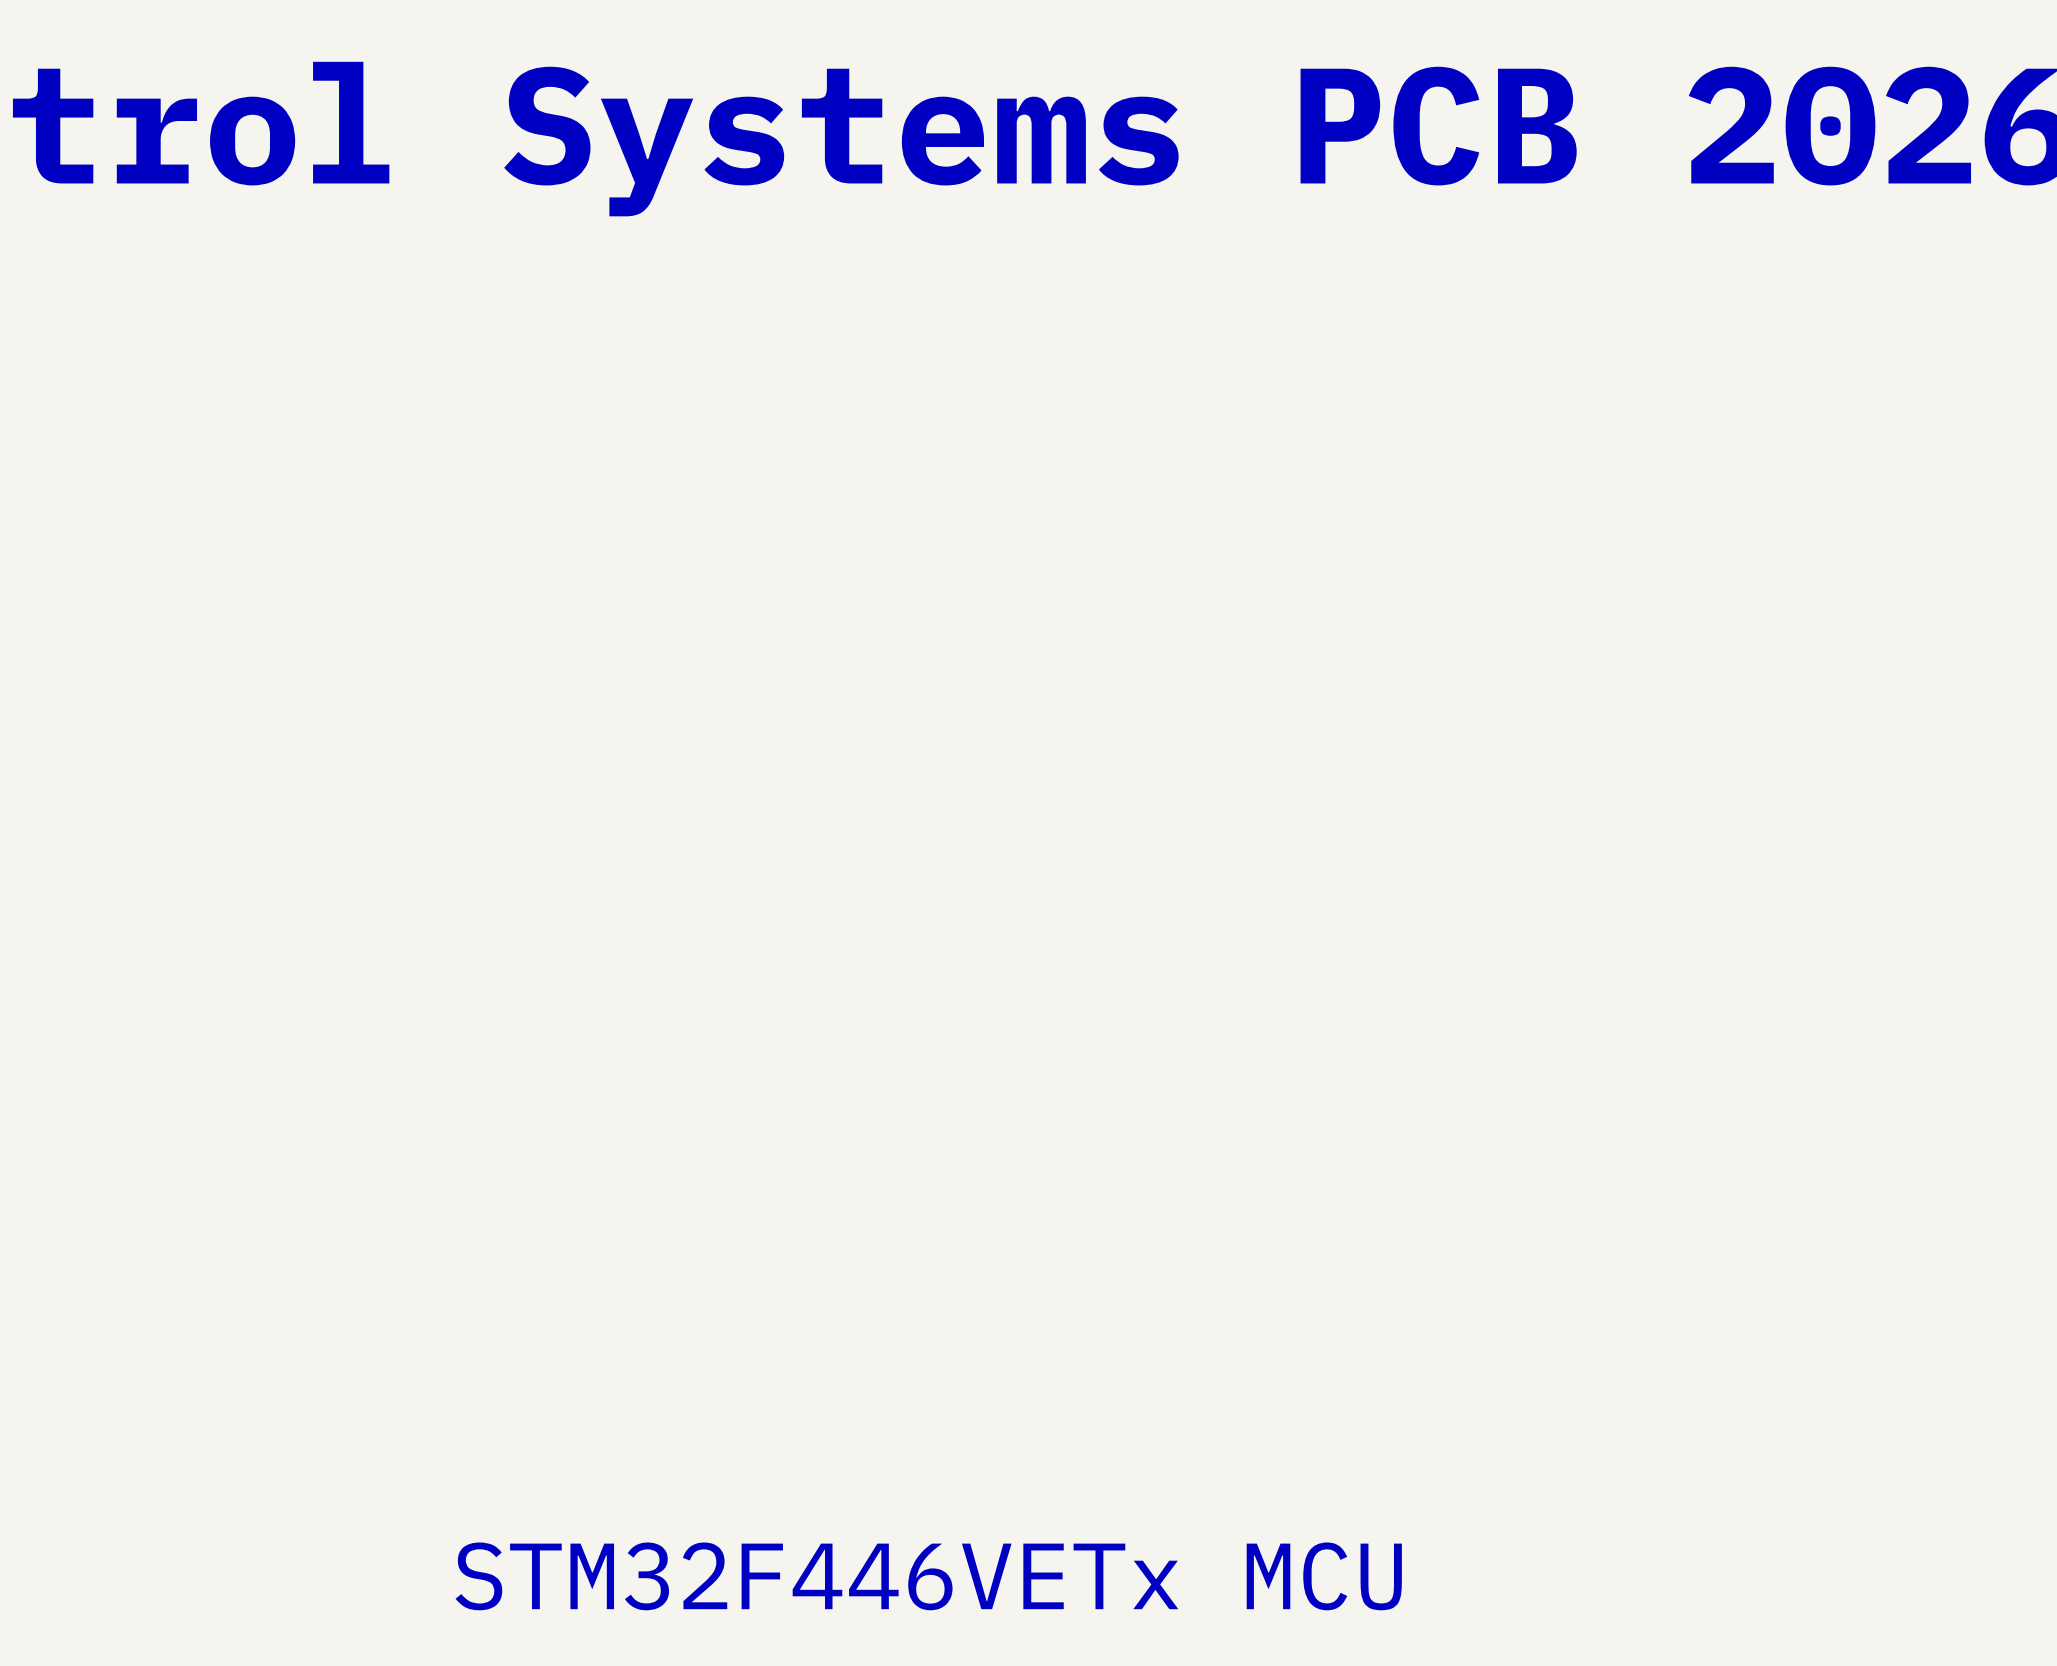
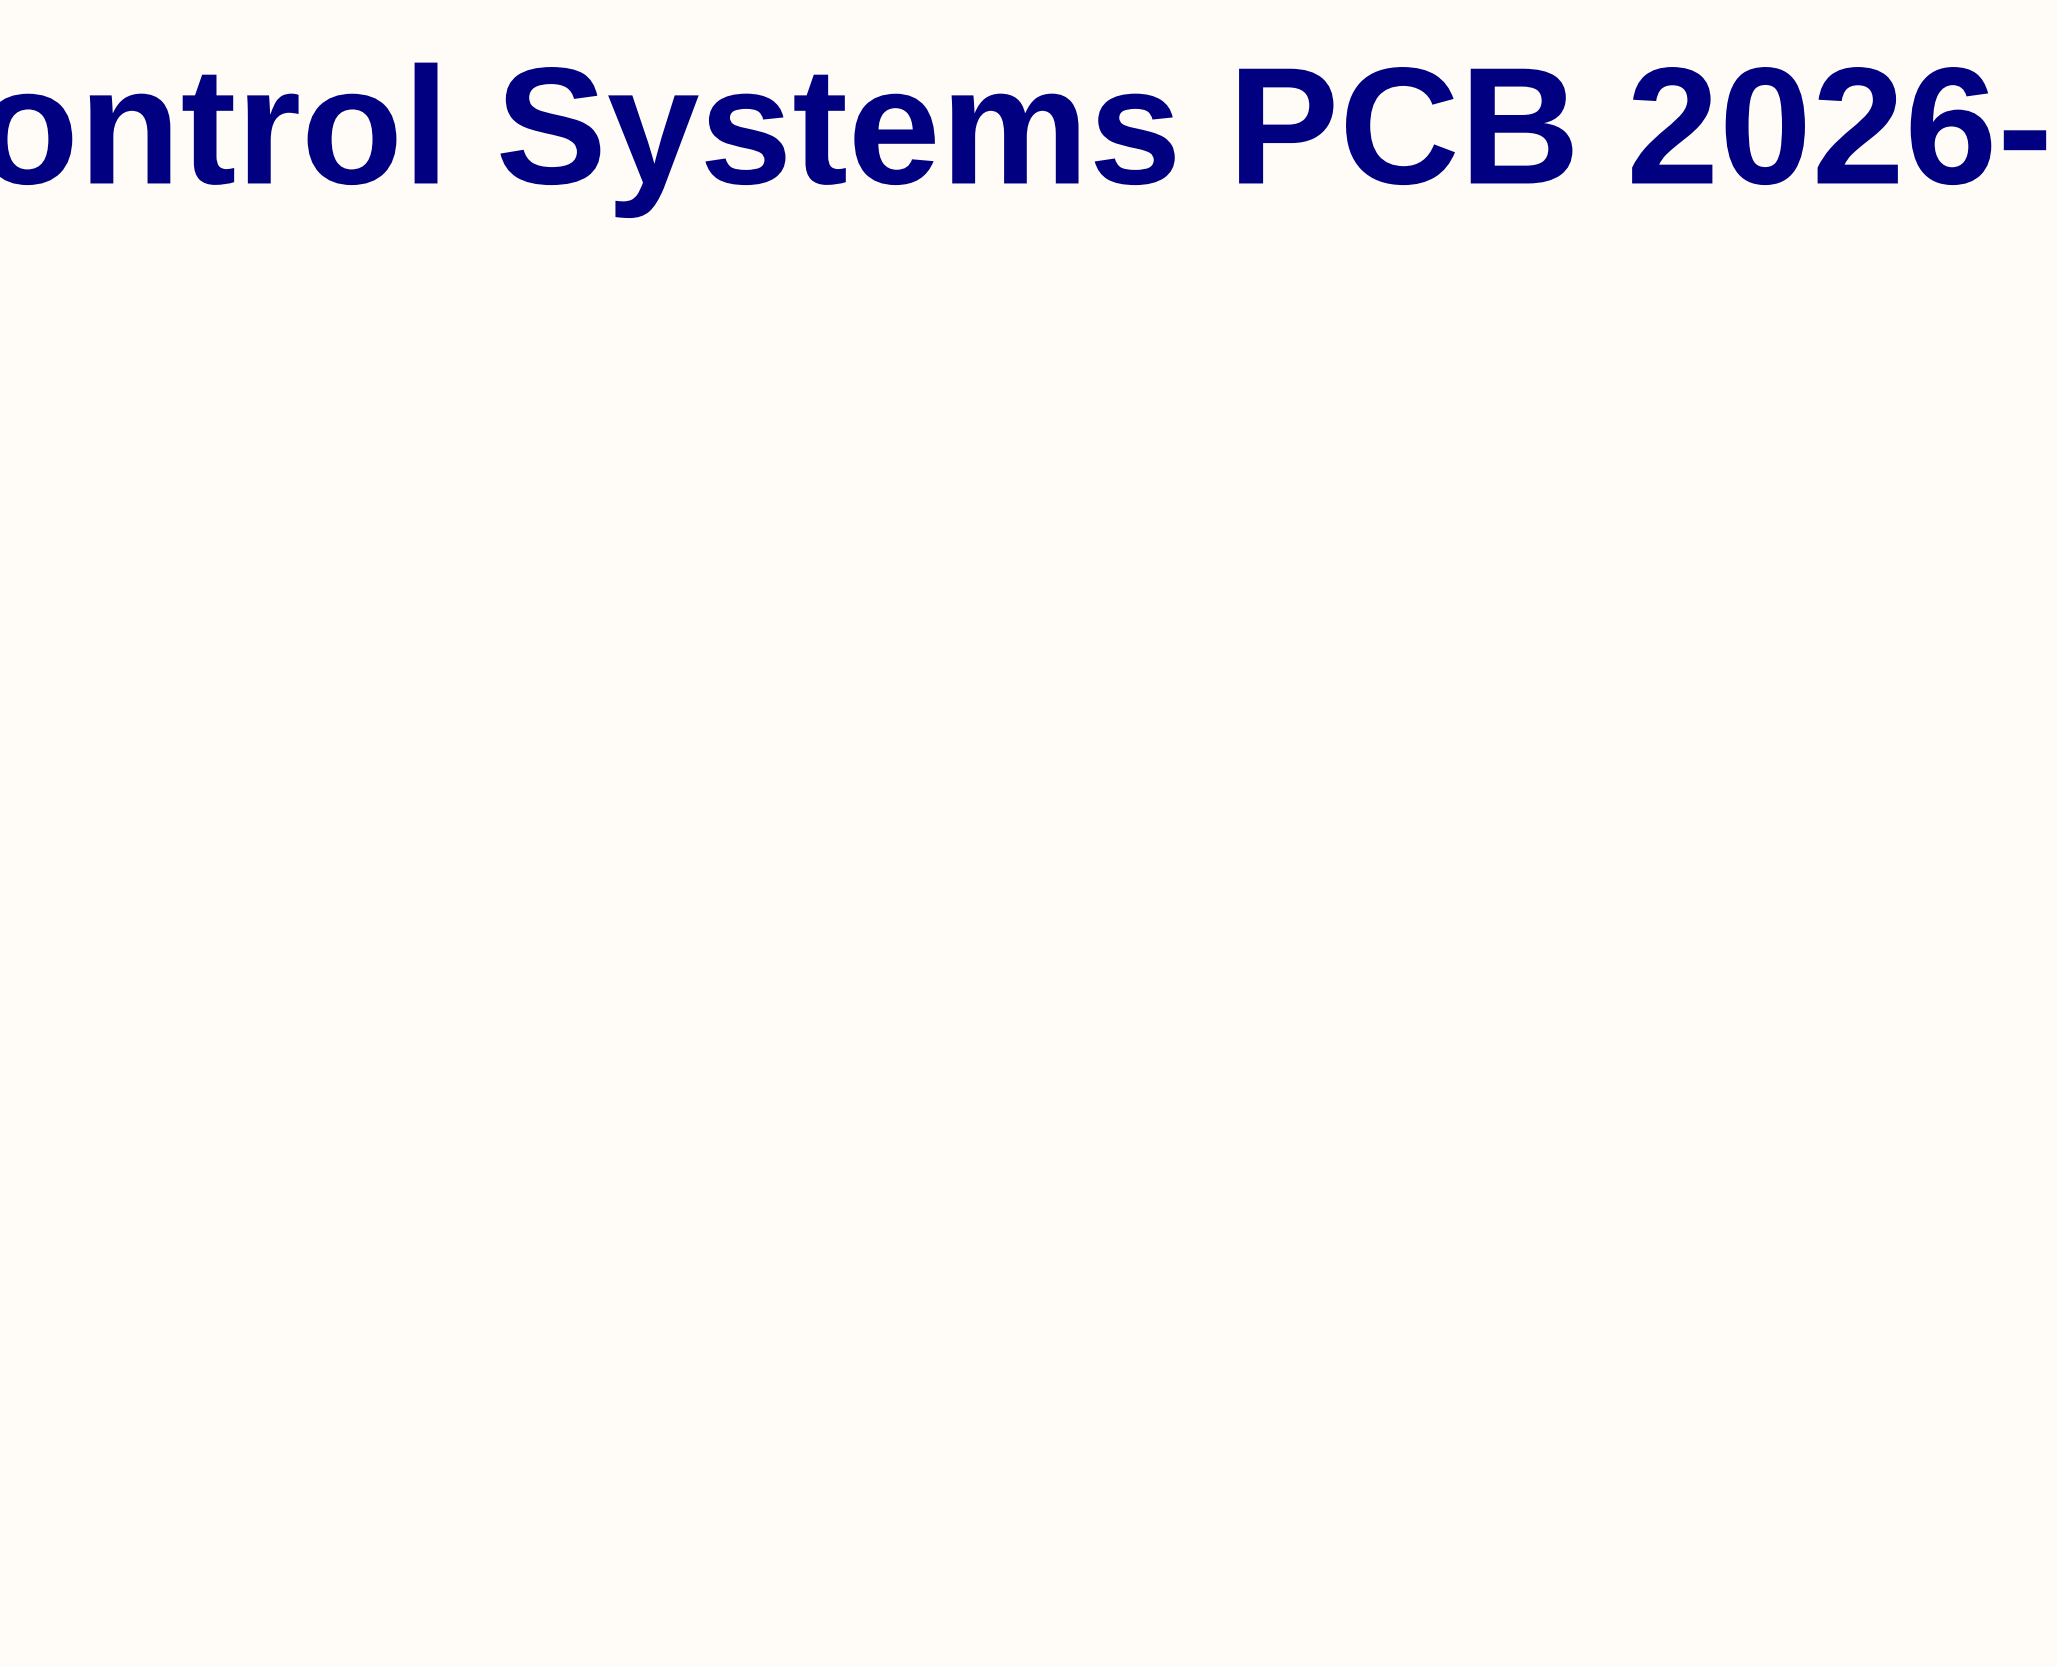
text: STM32F446VETx MCU (928, 1576) -> none

